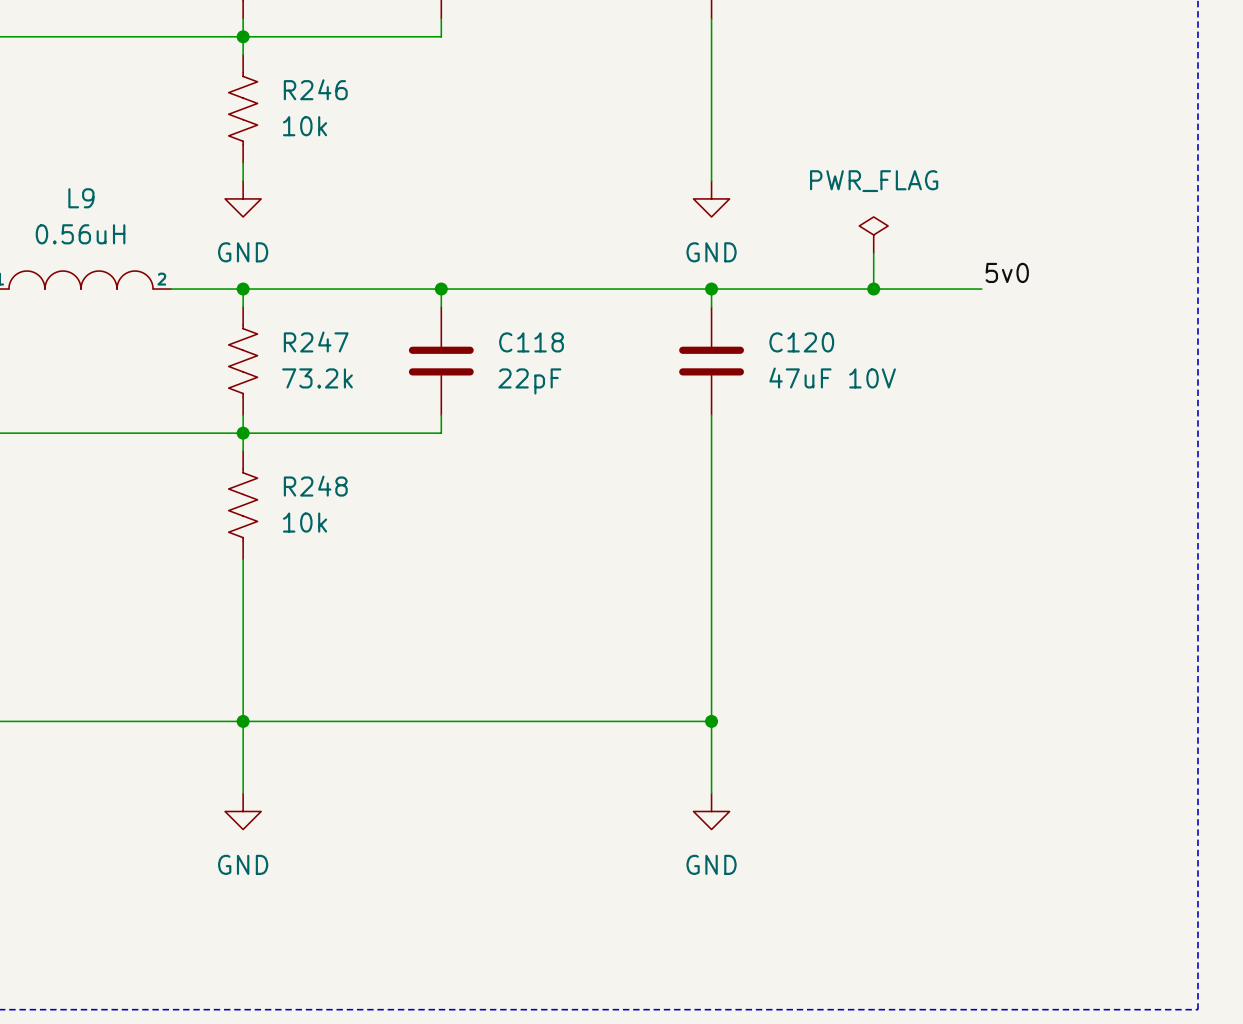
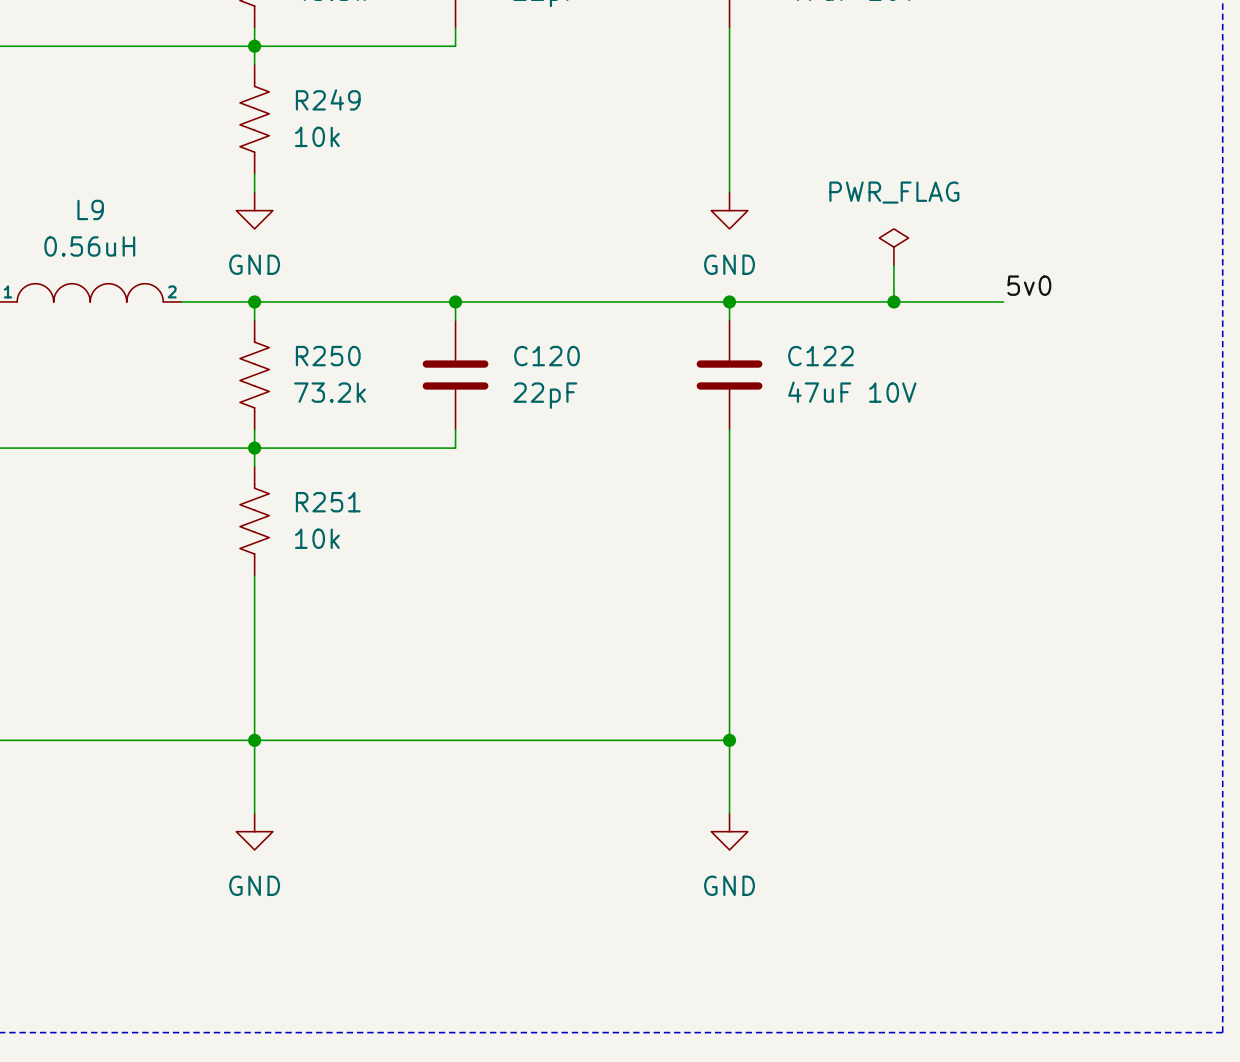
R246 name: R246 (315, 89) -> R249 (328, 99)
R247 name: R247 (316, 341) -> R250 (328, 356)
C118 name: C118 (531, 342) -> C120 (547, 356)
C120 name: C120 (801, 342) -> C122 (821, 356)
R248 name: R248 (315, 486) -> R251 (328, 502)

